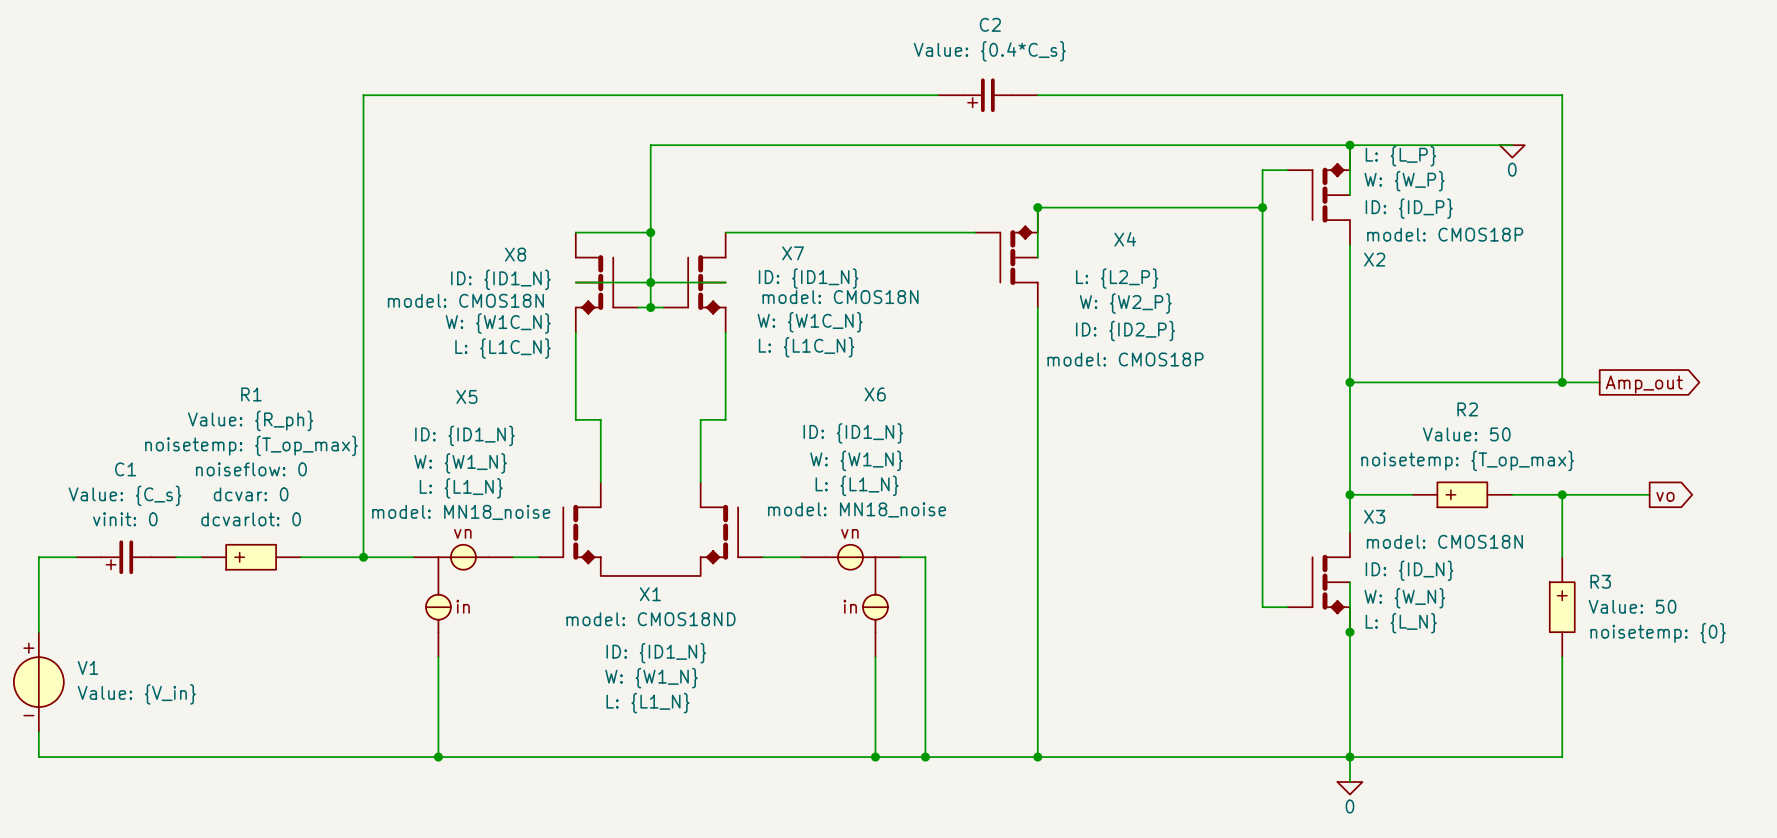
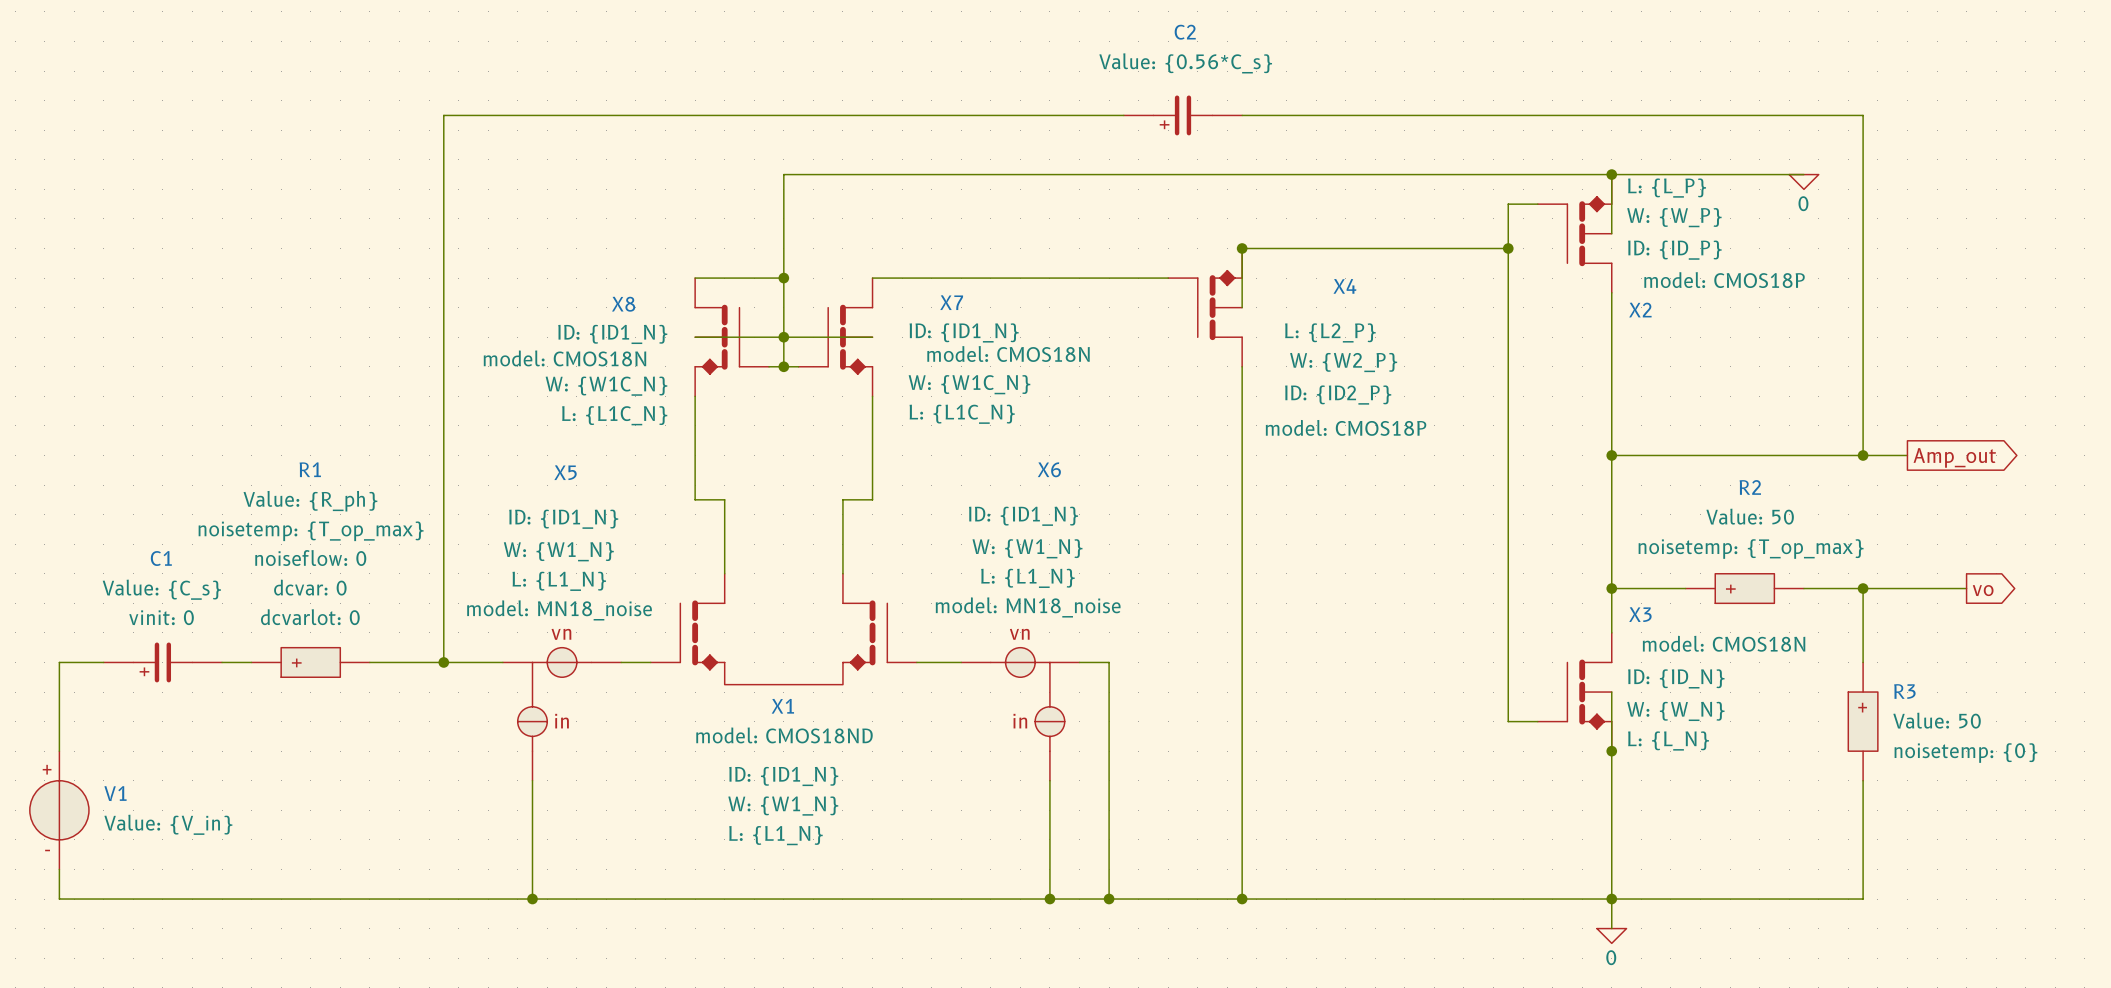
C2 value: Value: {0.4*C_s} (989, 51) -> Value: {0.56*C_s} (1185, 63)

